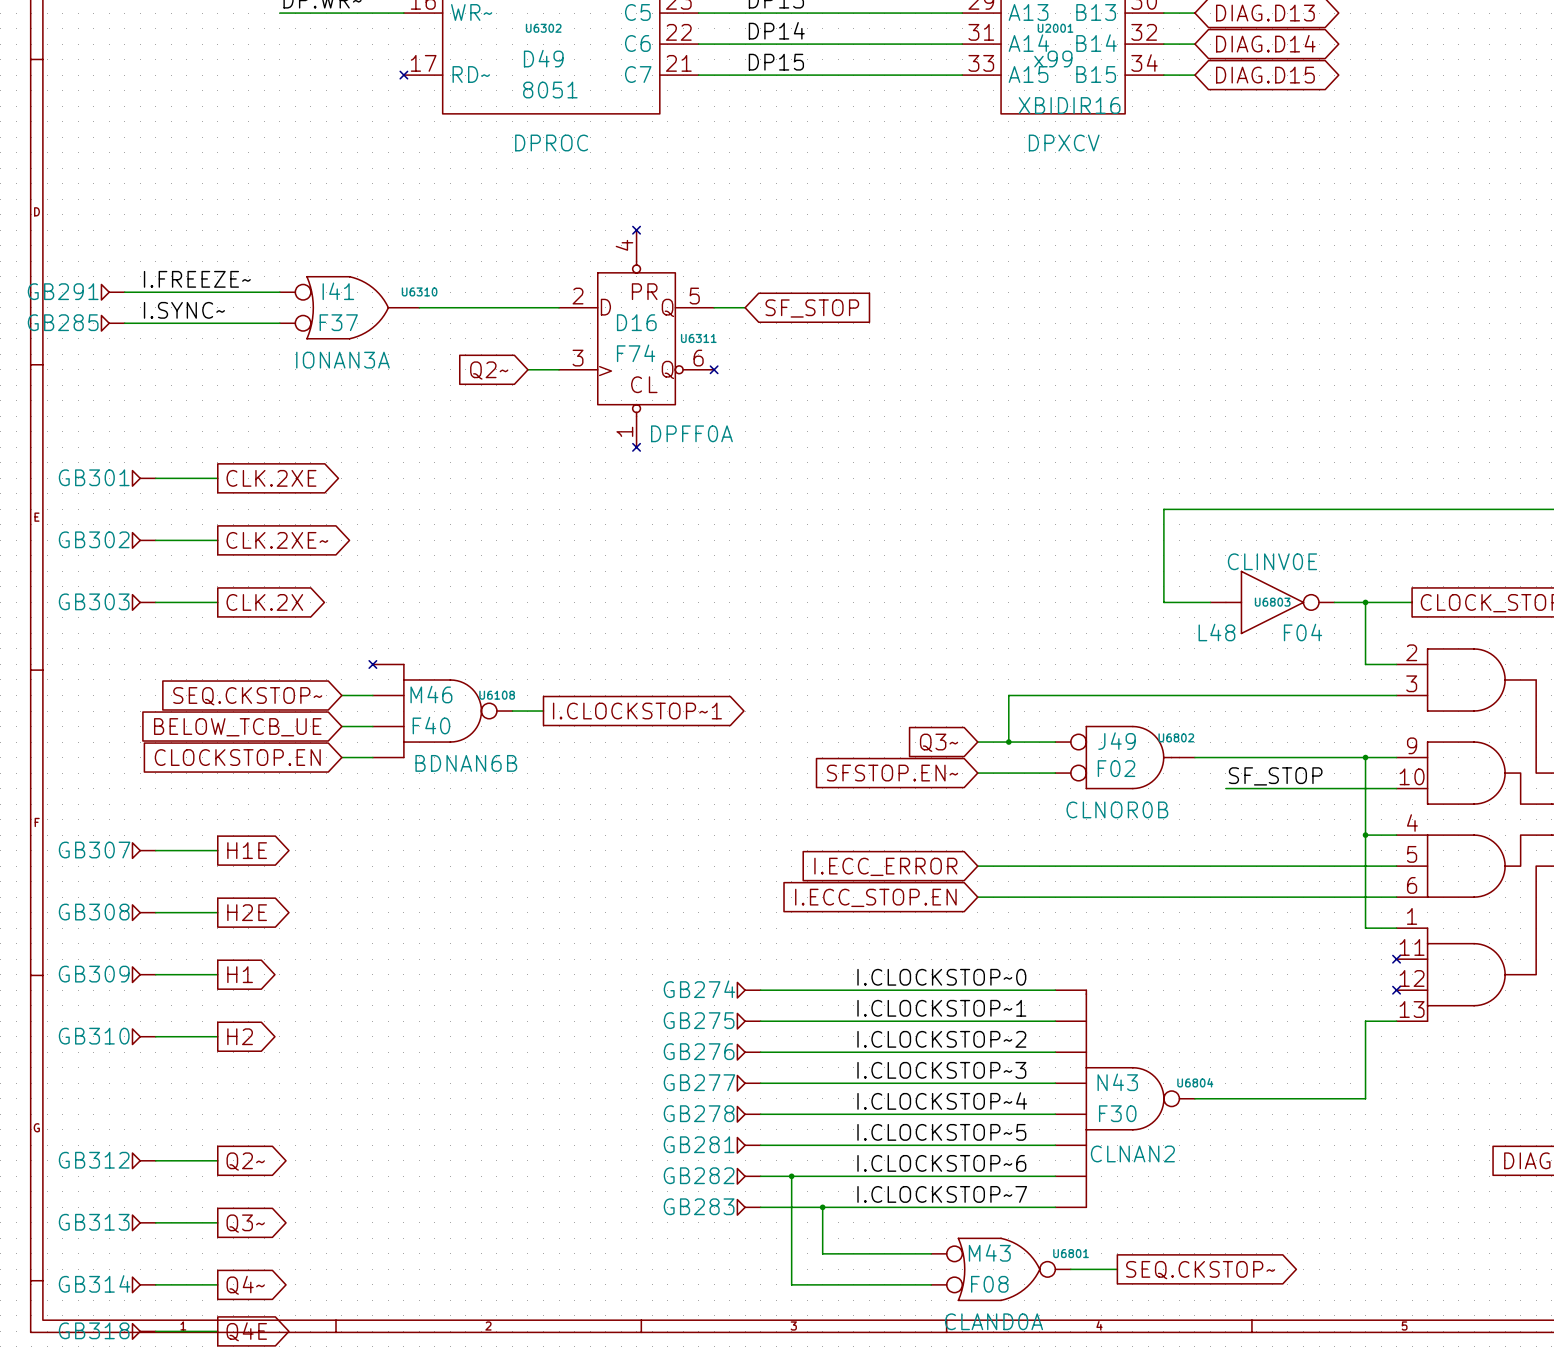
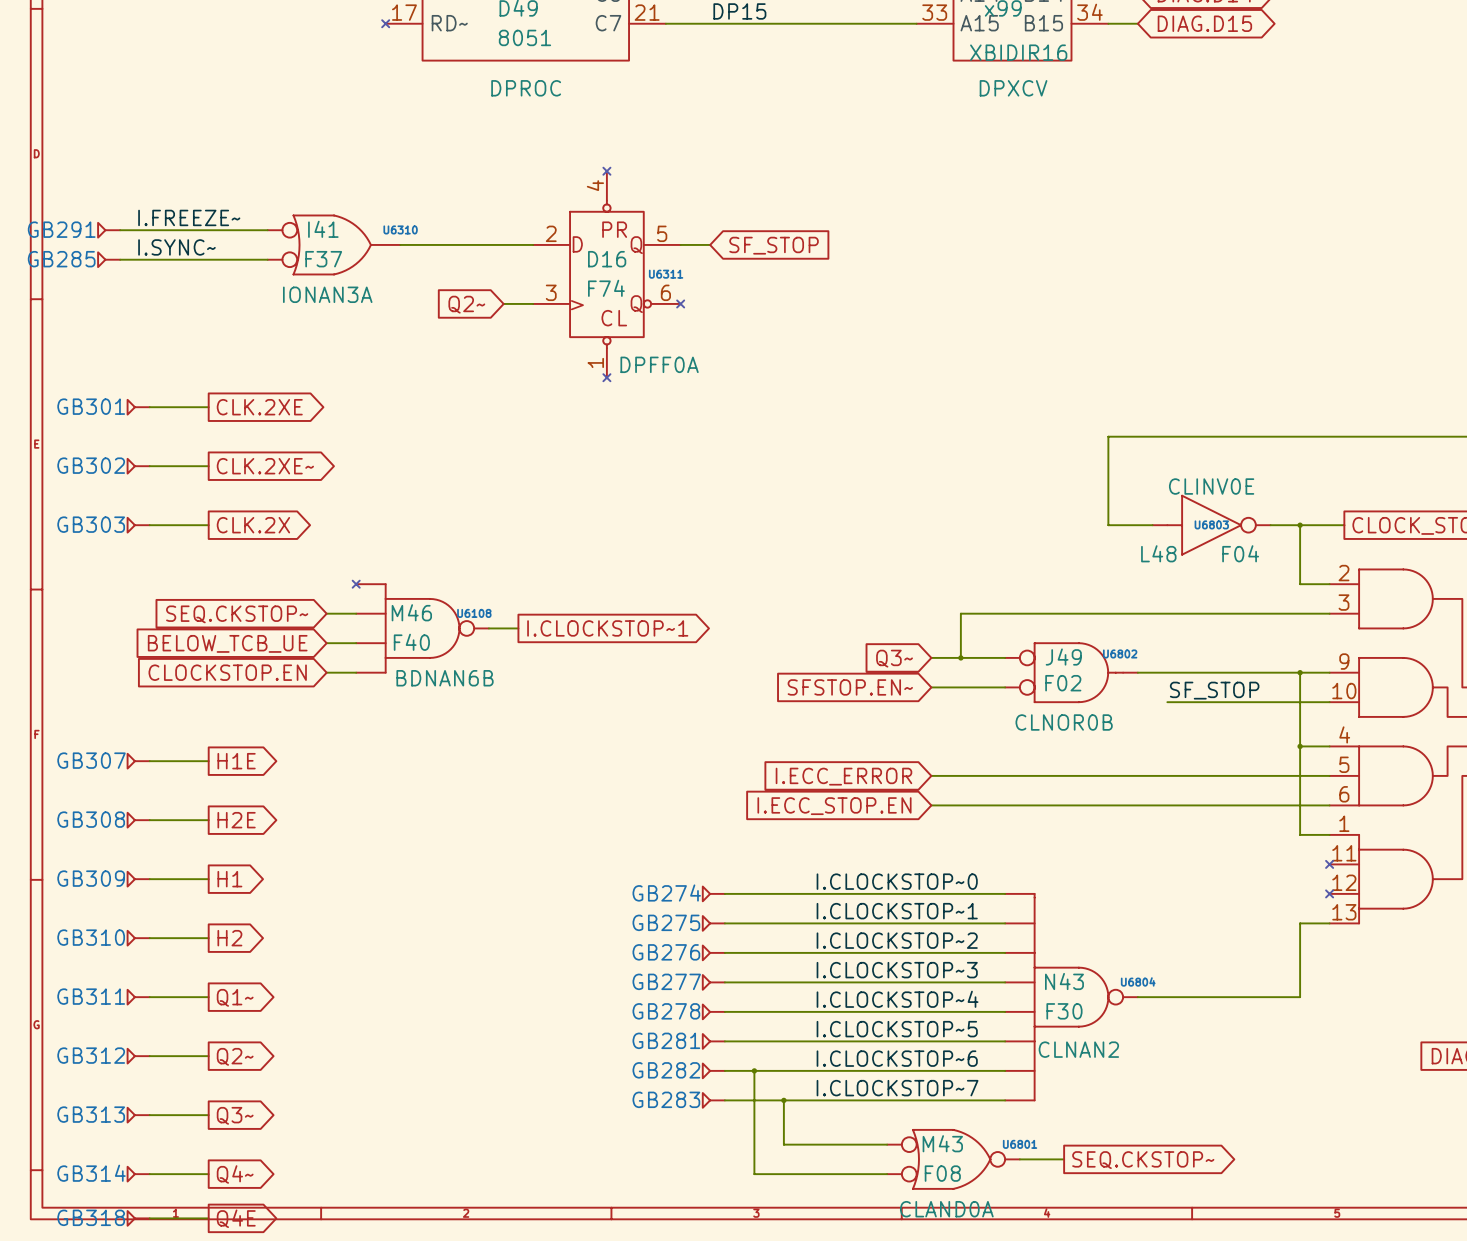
GB311: none -> (138, 997)
wire: none -> (149, 997) (208, 997)
global label: none -> Q1~ (235, 997)

